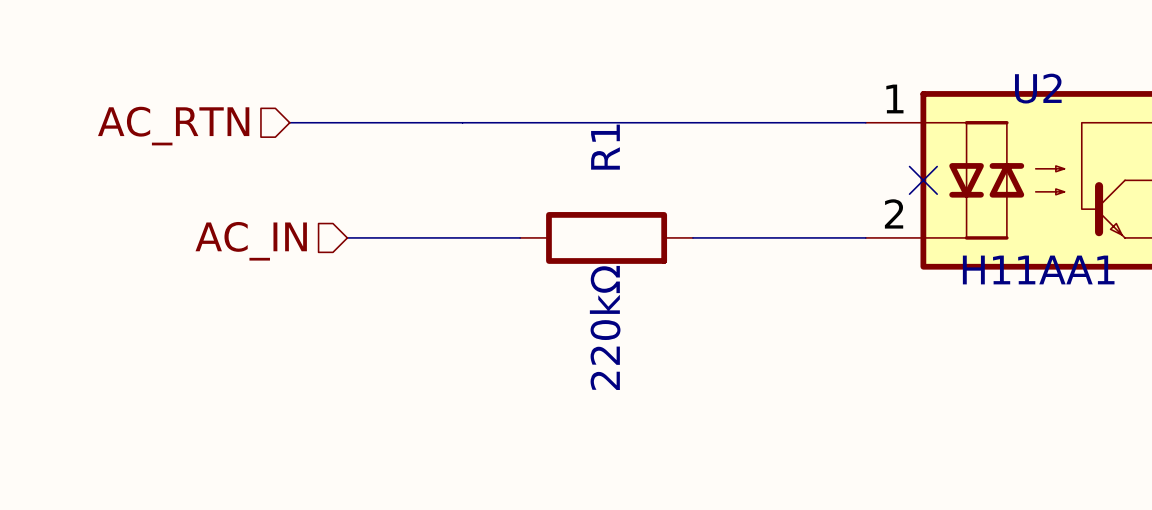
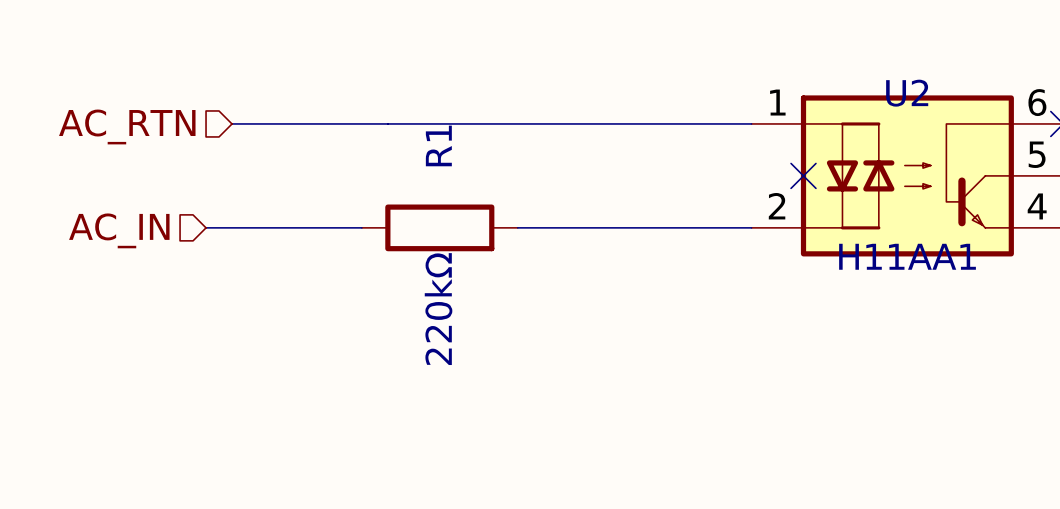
wire: (433, 237) (520, 237) -> (206, 227) (283, 227)
wire: none -> (517, 227) (595, 227)
R1 position: (606, 237) -> (439, 227)
hierarchical label position: AC_IN (251, 241) -> AC_IN (119, 230)

